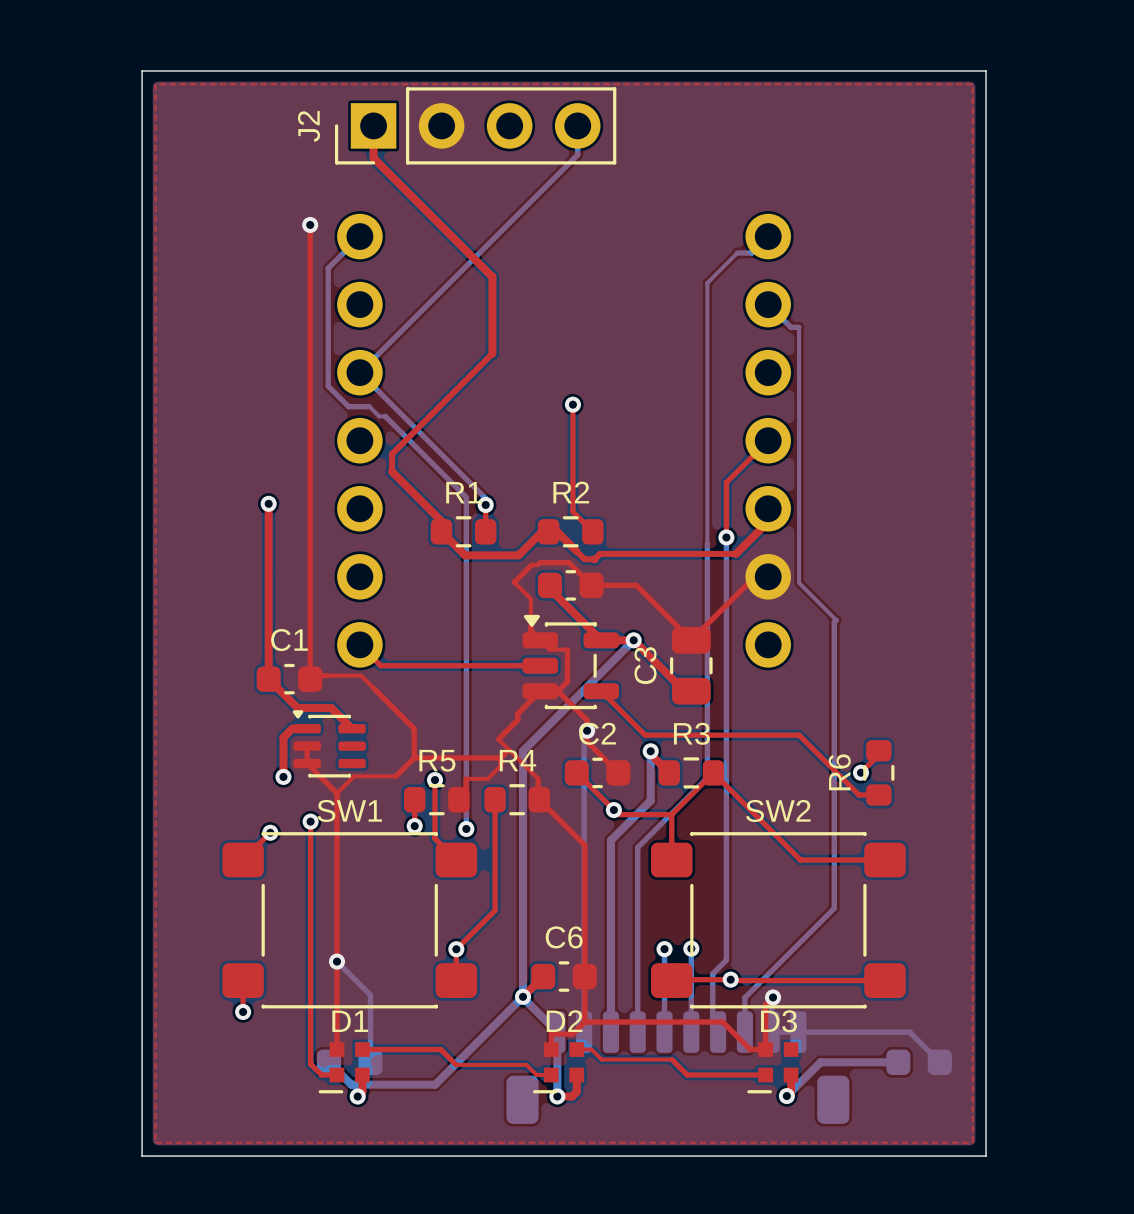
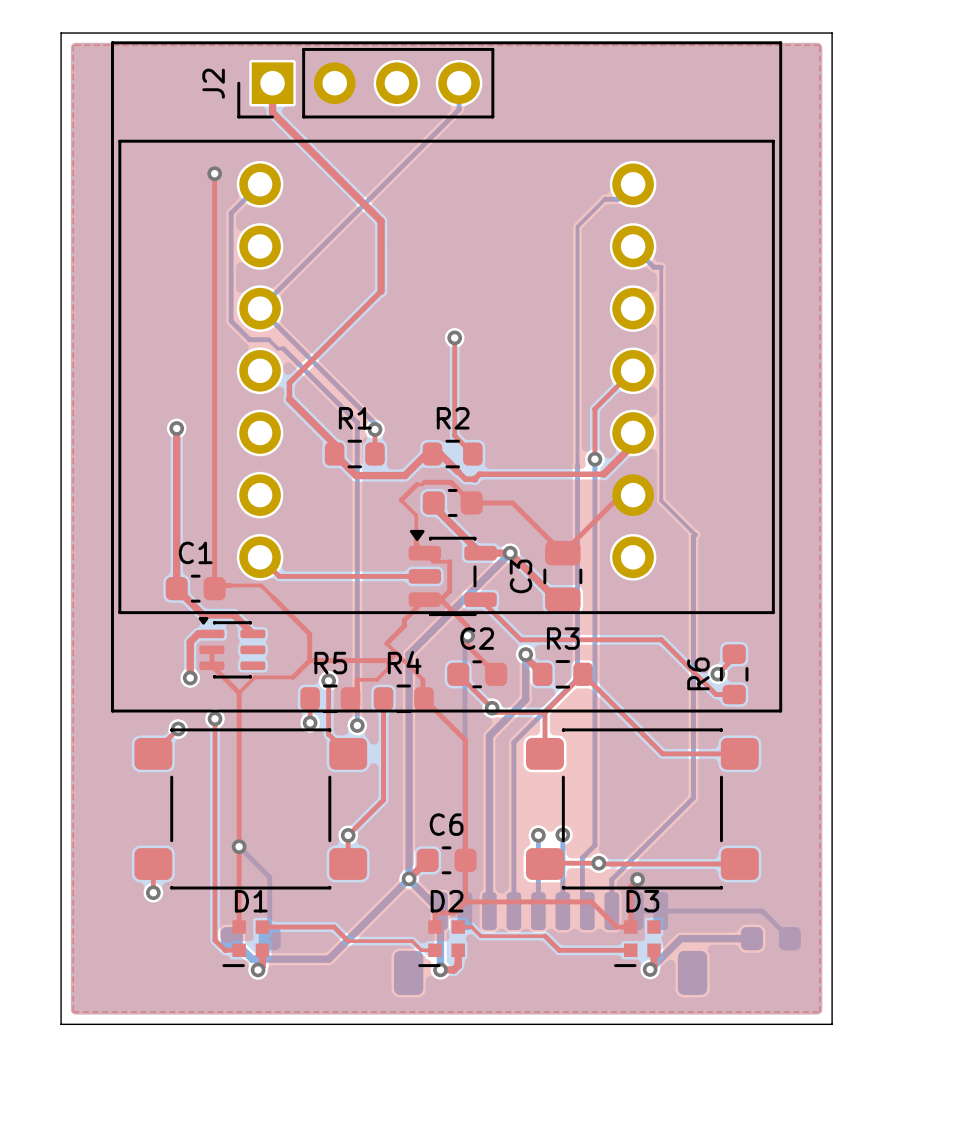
line: none -> (112, 42) (112, 711) (780, 711) (780, 42) (112, 42)
line: none -> (119, 141) (119, 612) (773, 612) (773, 141) (119, 141)
SW1 name: SW1 (349, 810) -> none
SW2 name: SW2 (778, 810) -> none

